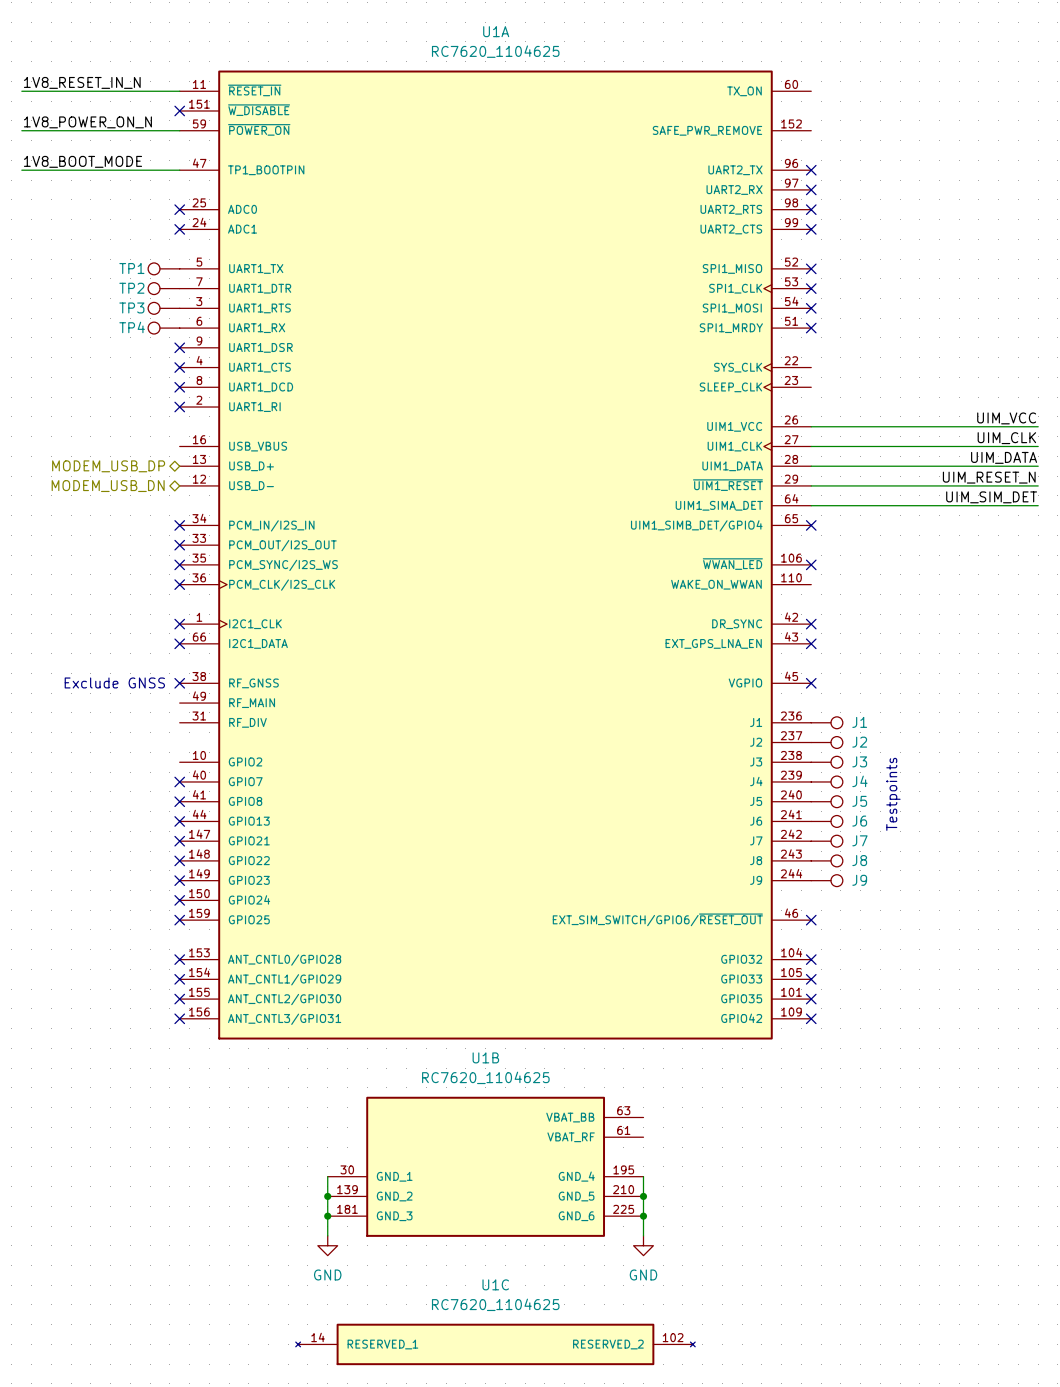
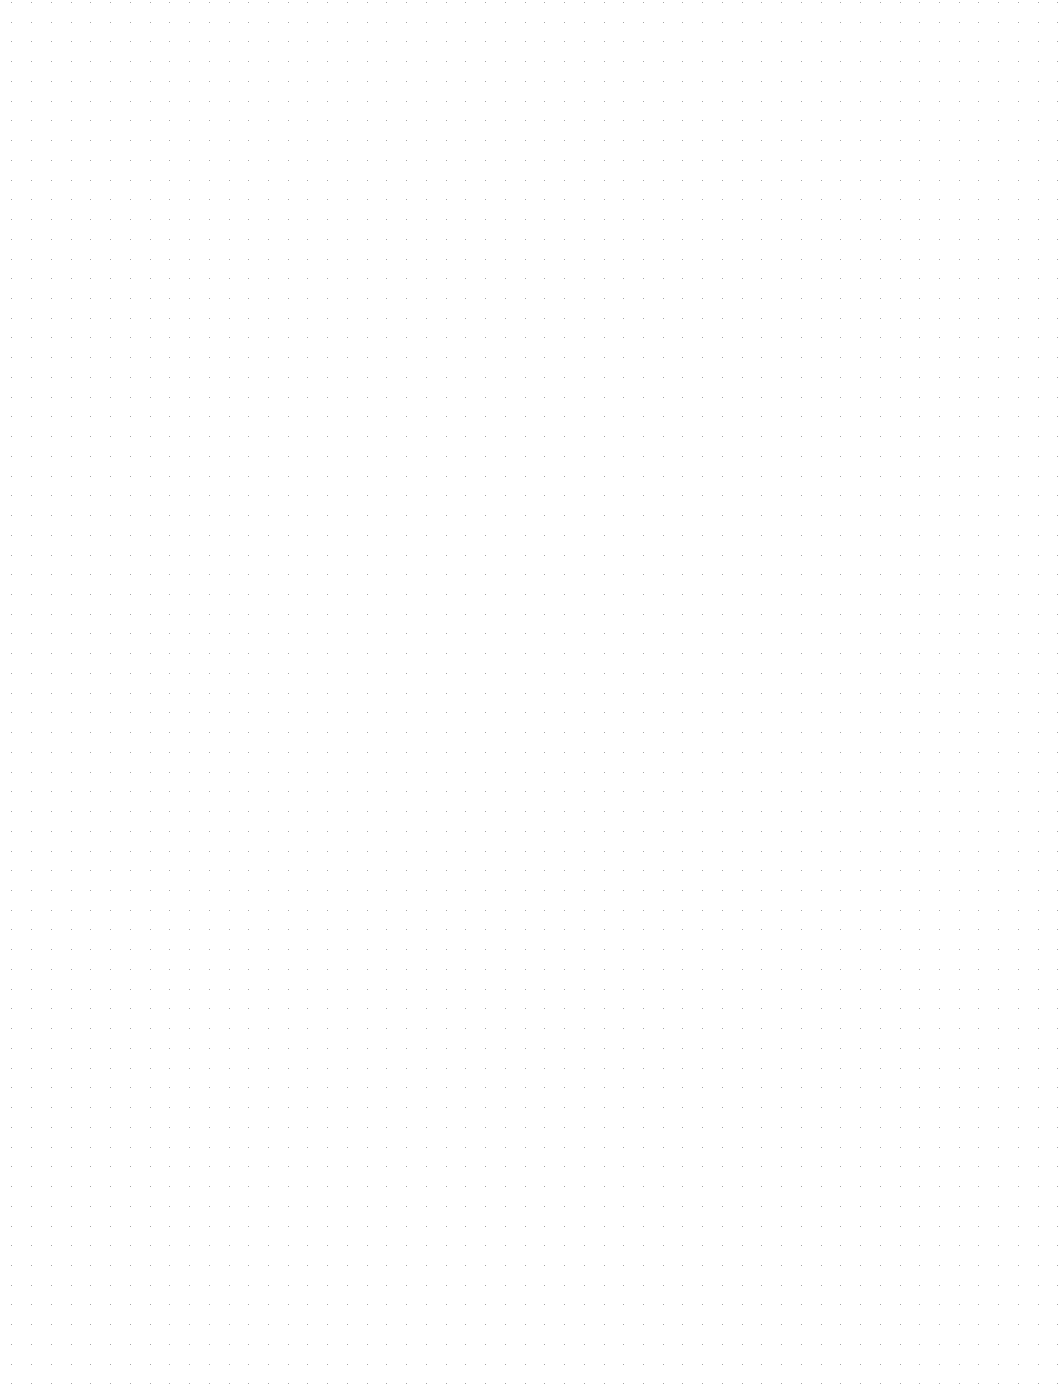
label: 1V8_RESET_IN_N (82, 82) -> none
wire: (21, 91) (179, 91) -> none
no-connect mark: (179, 110) -> none
label: 1V8_POWER_ON_N (87, 122) -> none
wire: (21, 130) (179, 130) -> none
label: 1V8_BOOT_MODE (82, 161) -> none
wire: (21, 170) (179, 170) -> none
no-connect mark: (811, 170) -> none
no-connect mark: (811, 189) -> none
no-connect mark: (179, 209) -> none
no-connect mark: (811, 209) -> none
no-connect mark: (179, 229) -> none
no-connect mark: (811, 229) -> none
TP1: (163, 268) -> none
no-connect mark: (811, 268) -> none
TP2: (163, 288) -> none
no-connect mark: (811, 288) -> none
TP3: (163, 308) -> none
no-connect mark: (811, 308) -> none
TP4: (163, 328) -> none
no-connect mark: (811, 328) -> none
no-connect mark: (179, 347) -> none
no-connect mark: (179, 367) -> none
no-connect mark: (179, 387) -> none
no-connect mark: (179, 407) -> none
label: UIM_VCC (1006, 418) -> none
wire: (811, 426) (1038, 426) -> none
label: UIM_CLK (1006, 438) -> none
wire: (811, 446) (1038, 446) -> none
label: UIM_DATA (1004, 457) -> none
hierarchical label: MODEM_USB_DP (108, 466) -> none
wire: (811, 466) (1038, 466) -> none
label: UIM_RESET_N (989, 477) -> none
wire: (811, 485) (1038, 485) -> none
hierarchical label: MODEM_USB_DN (108, 486) -> none
label: UIM_SIM_DET (991, 497) -> none
wire: (811, 505) (1038, 505) -> none
no-connect mark: (179, 525) -> none
no-connect mark: (811, 525) -> none
no-connect mark: (179, 545) -> none
U1A: RC7620_1104625 (495, 555) -> none
no-connect mark: (179, 564) -> none
no-connect mark: (811, 564) -> none
no-connect mark: (179, 584) -> none
no-connect mark: (179, 624) -> none
no-connect mark: (811, 624) -> none
no-connect mark: (179, 643) -> none
no-connect mark: (811, 643) -> none
text: Exclude GNSS (114, 682) -> none
no-connect mark: (179, 683) -> none
no-connect mark: (811, 683) -> none
J1: (827, 722) -> none
J2: (827, 742) -> none
J3: (827, 762) -> none
no-connect mark: (179, 781) -> none
J4: (827, 781) -> none
text: Testpoints (893, 794) -> none
no-connect mark: (179, 801) -> none
J5: (827, 801) -> none
no-connect mark: (179, 821) -> none
J6: (827, 821) -> none
no-connect mark: (179, 841) -> none
J7: (827, 841) -> none
no-connect mark: (179, 860) -> none
J8: (827, 860) -> none
no-connect mark: (179, 880) -> none
J9: (827, 880) -> none
no-connect mark: (179, 900) -> none
no-connect mark: (179, 920) -> none
no-connect mark: (811, 920) -> none
no-connect mark: (179, 959) -> none
no-connect mark: (811, 959) -> none
no-connect mark: (179, 979) -> none
no-connect mark: (811, 979) -> none
no-connect mark: (179, 999) -> none
no-connect mark: (811, 999) -> none
no-connect mark: (179, 1018) -> none
no-connect mark: (811, 1018) -> none
U1B: RC7620_1104625 (485, 1166) -> none
wire: (327, 1176) (327, 1235) -> none
wire: (643, 1176) (643, 1235) -> none
junction: (327, 1196) -> none
junction: (643, 1196) -> none
junction: (327, 1216) -> none
junction: (643, 1216) -> none
power symbol: GND (327, 1245) -> none
power symbol: GND (643, 1245) -> none
U1C: RC7620_1104625 (495, 1344) -> none

